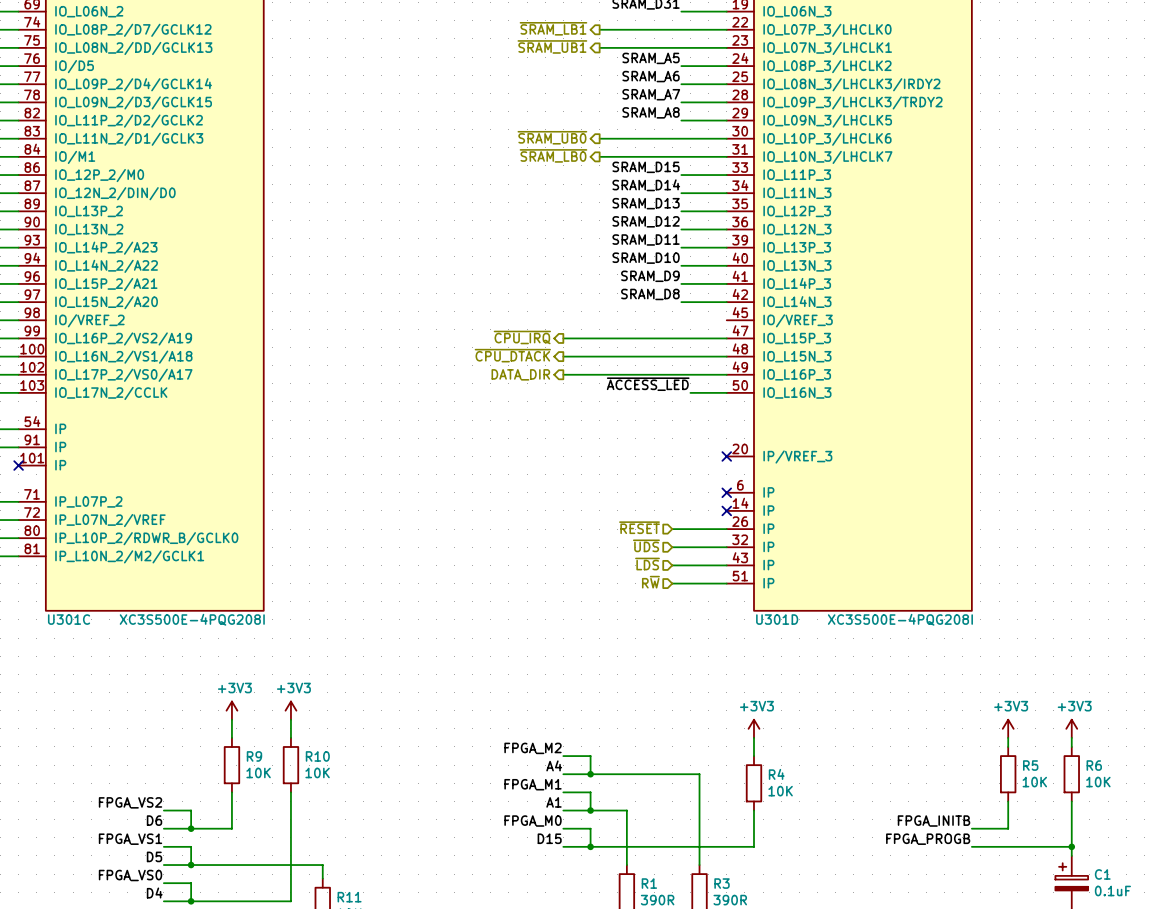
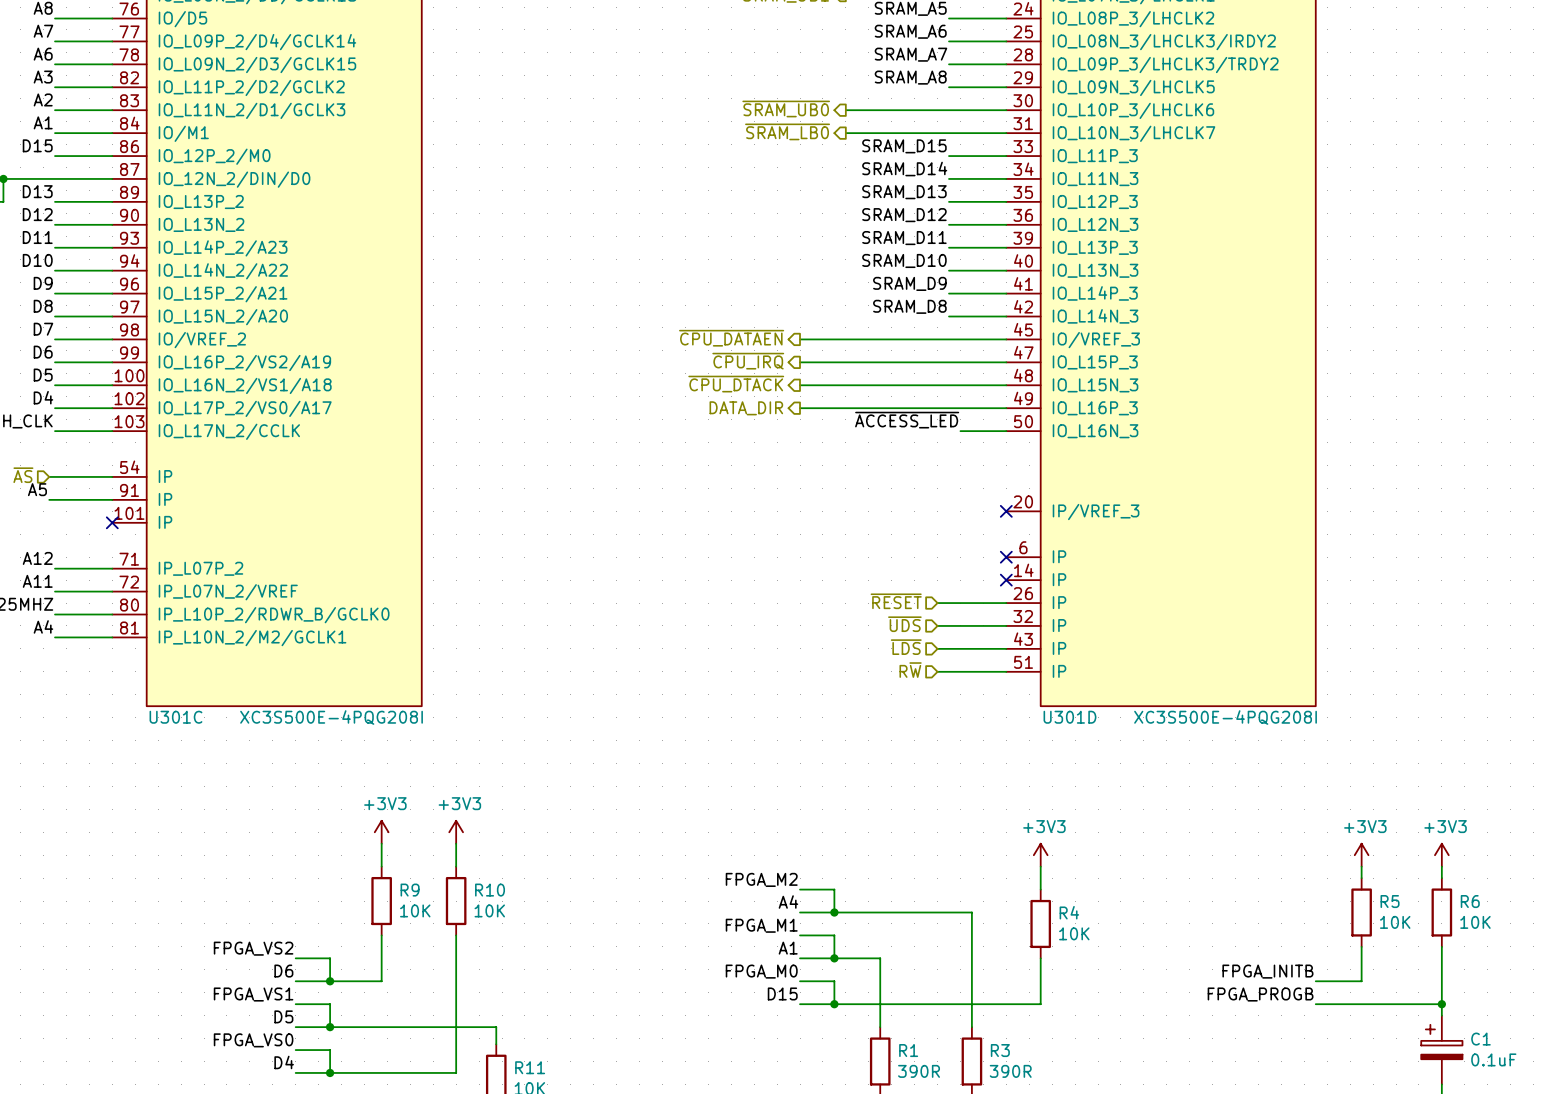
hierarchical label: none -> ~{CPU_DATAEN} (731, 338)
wire: none -> (800, 339) (1006, 339)

